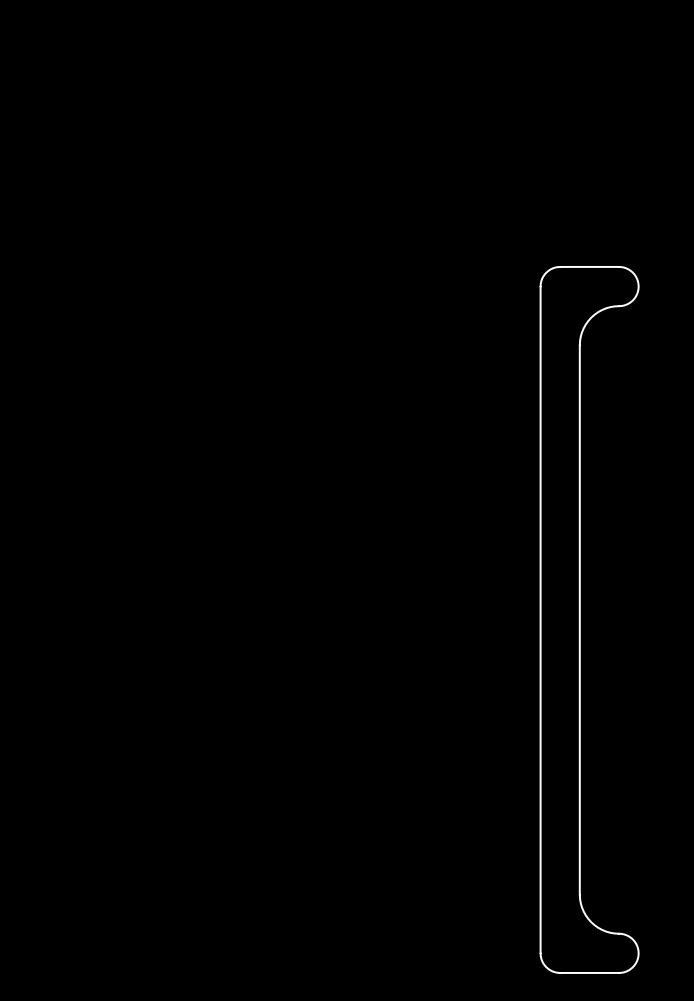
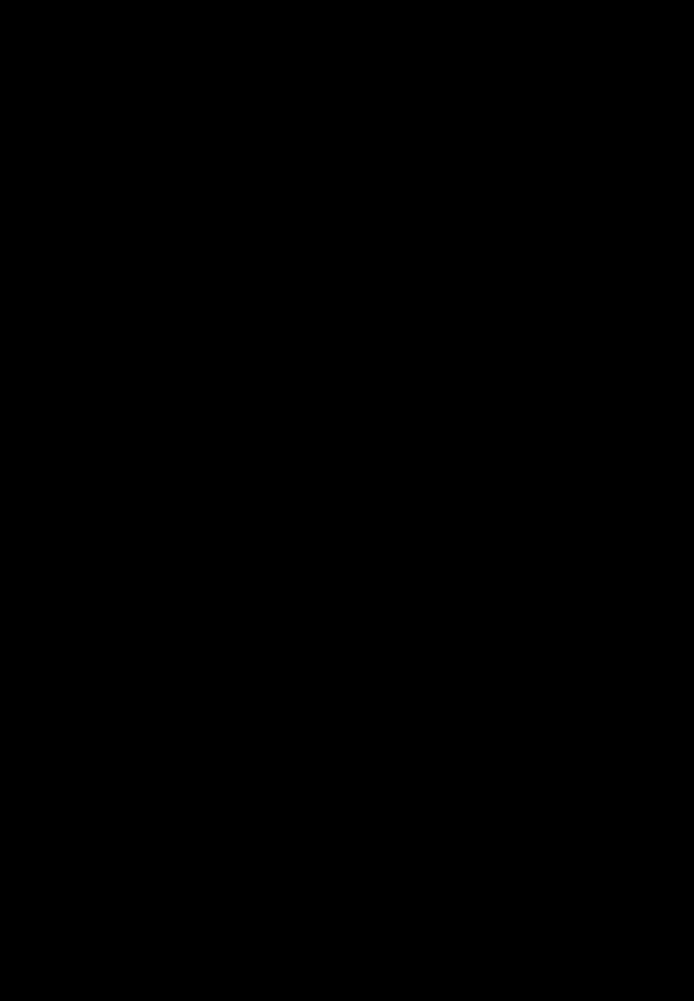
board edge: (560, 266) (624, 267) (634, 274) (638, 284) (637, 294) (630, 302) (624, 305) (606, 308) (591, 317) (583, 328) (579, 345) (580, 898) (583, 911) (594, 925) (606, 931) (626, 935) (636, 943) (638, 953) (636, 963) (630, 968) (621, 972) (555, 972) (544, 965) (540, 955) (540, 286) (546, 272) (560, 266) -> none

